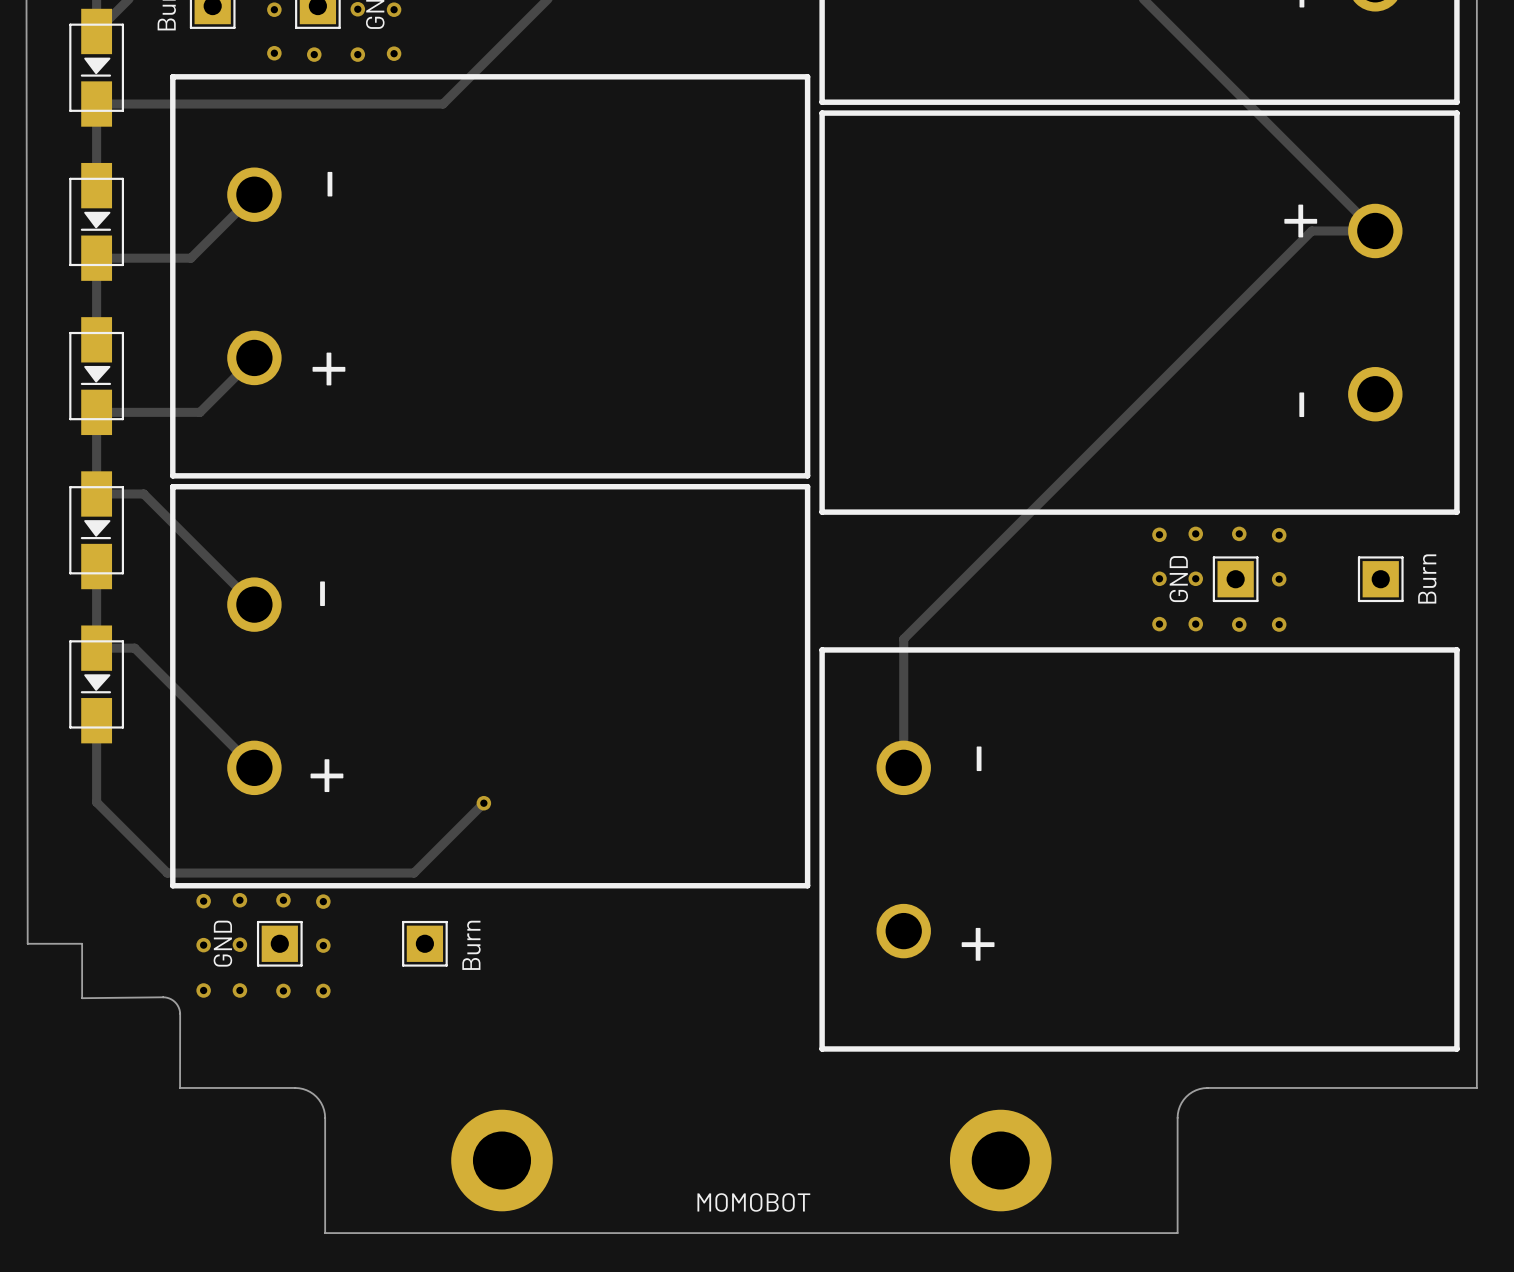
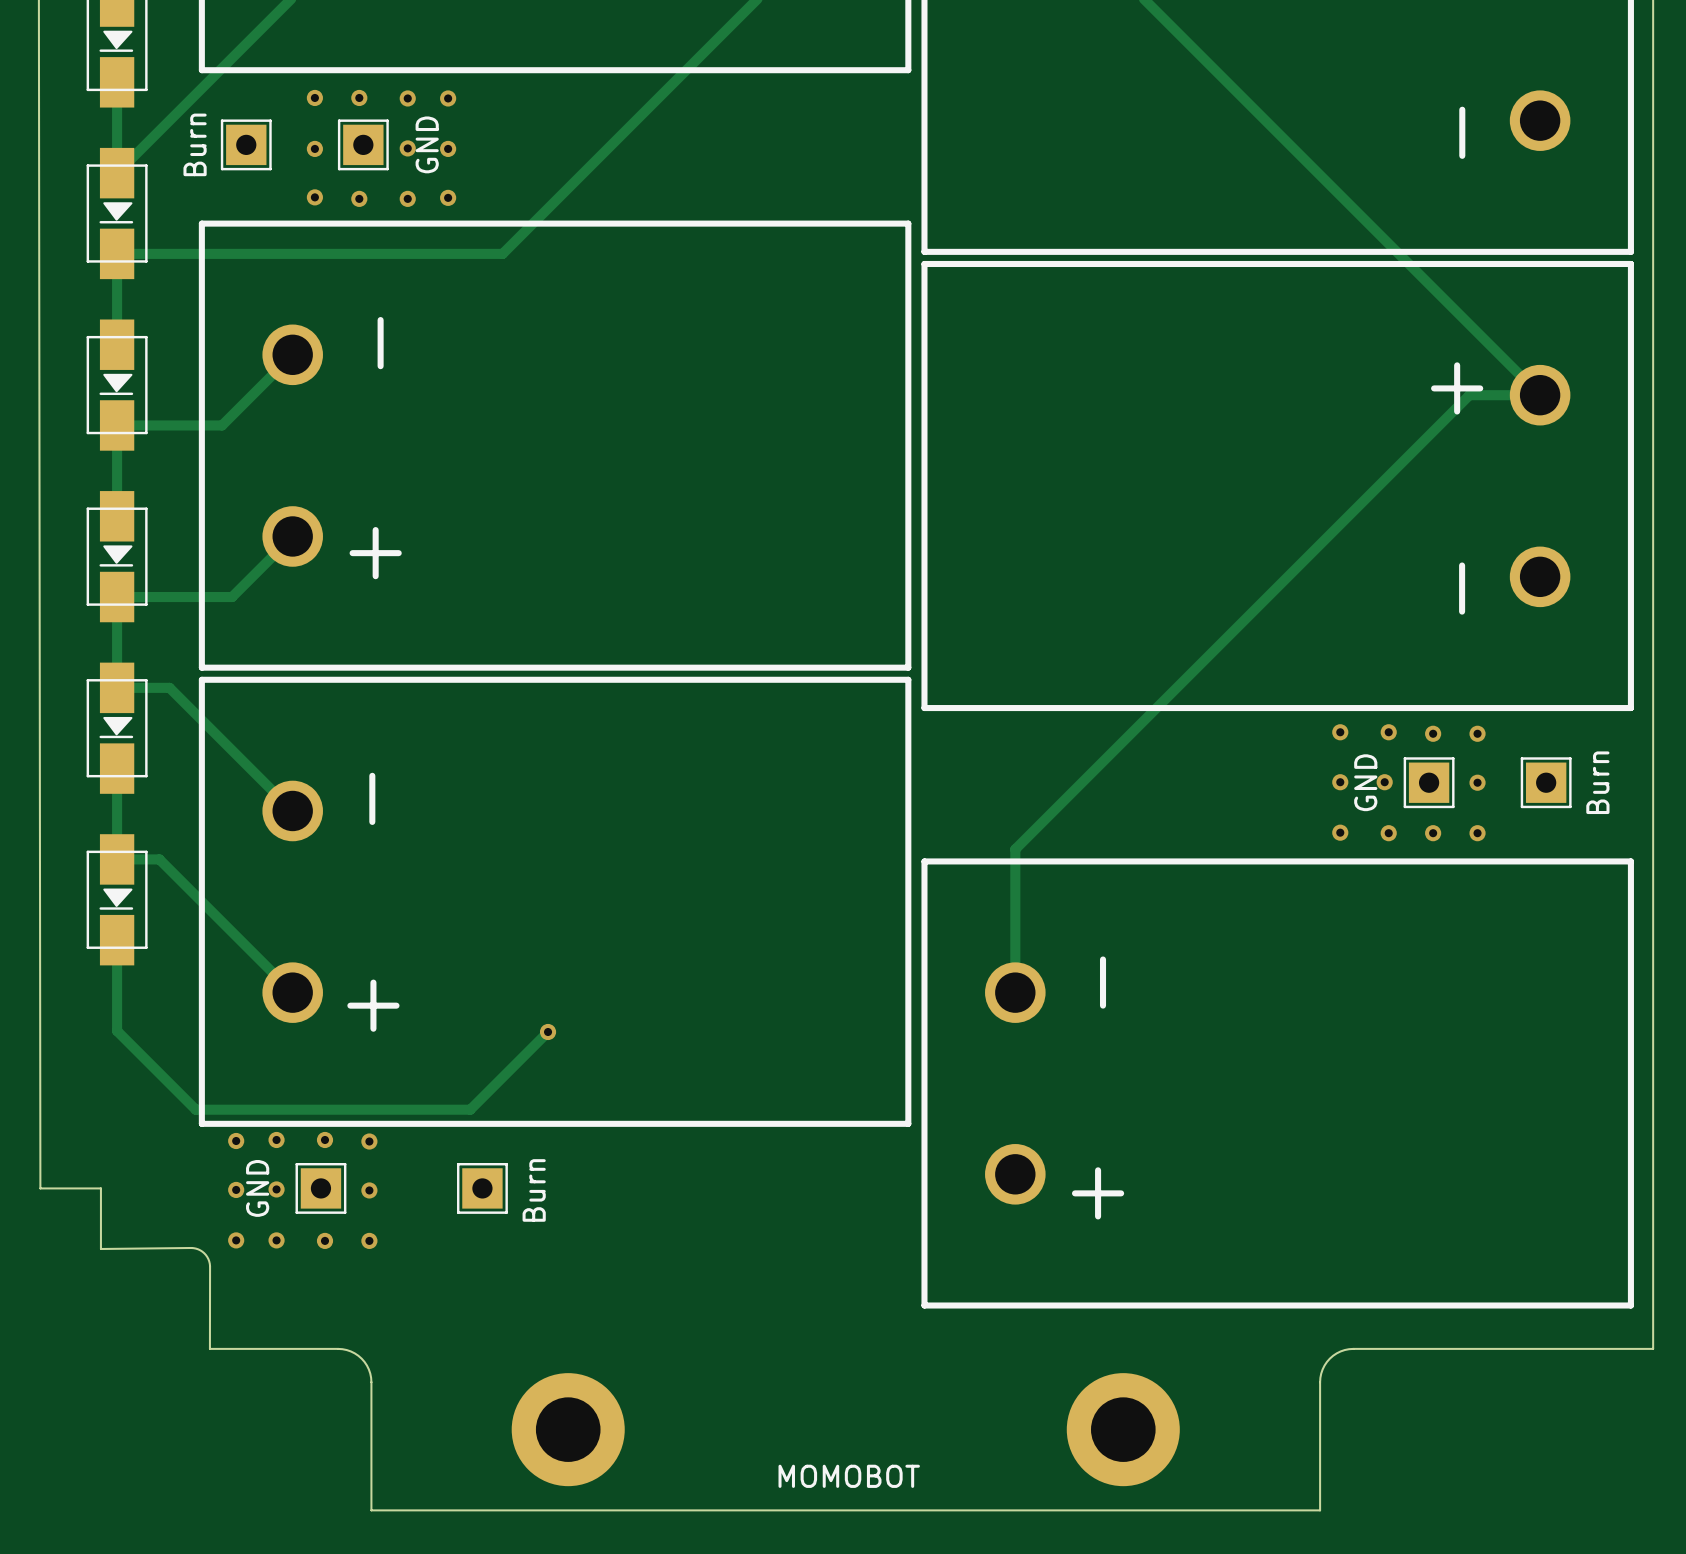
via: (1159, 534) -> none
via: none -> (1477, 733)
via: (1159, 578) -> none
via: none -> (1384, 782)
part position: (1235, 579) -> (1429, 782)
via: (1279, 579) -> none
via: none -> (1477, 782)
via: (1159, 624) -> none
via: none -> (1477, 833)

